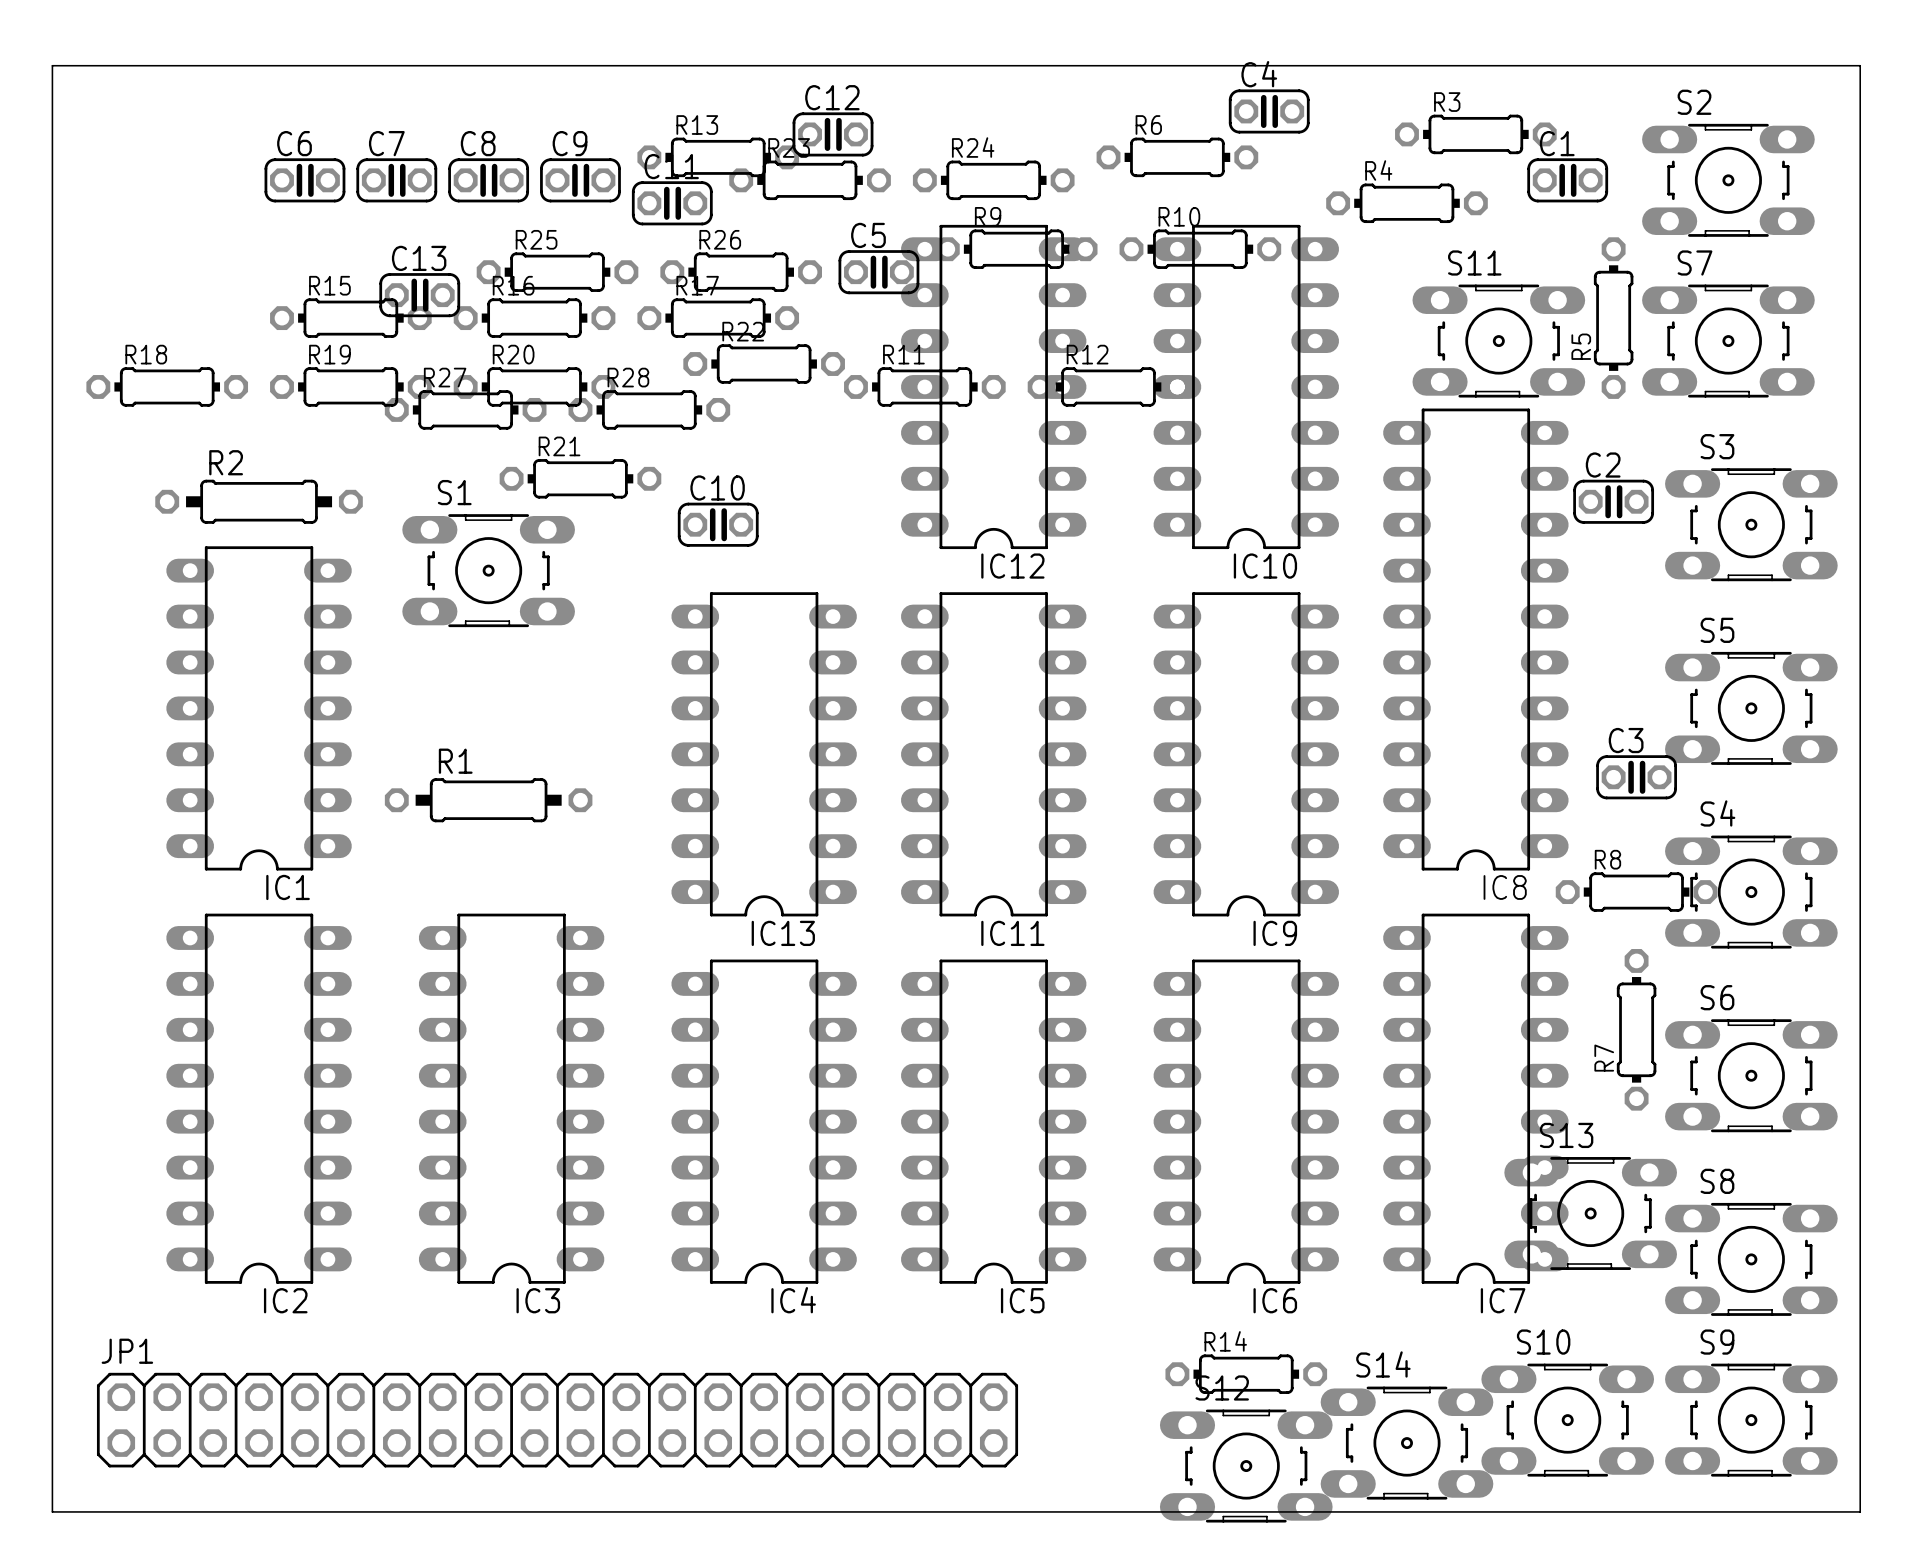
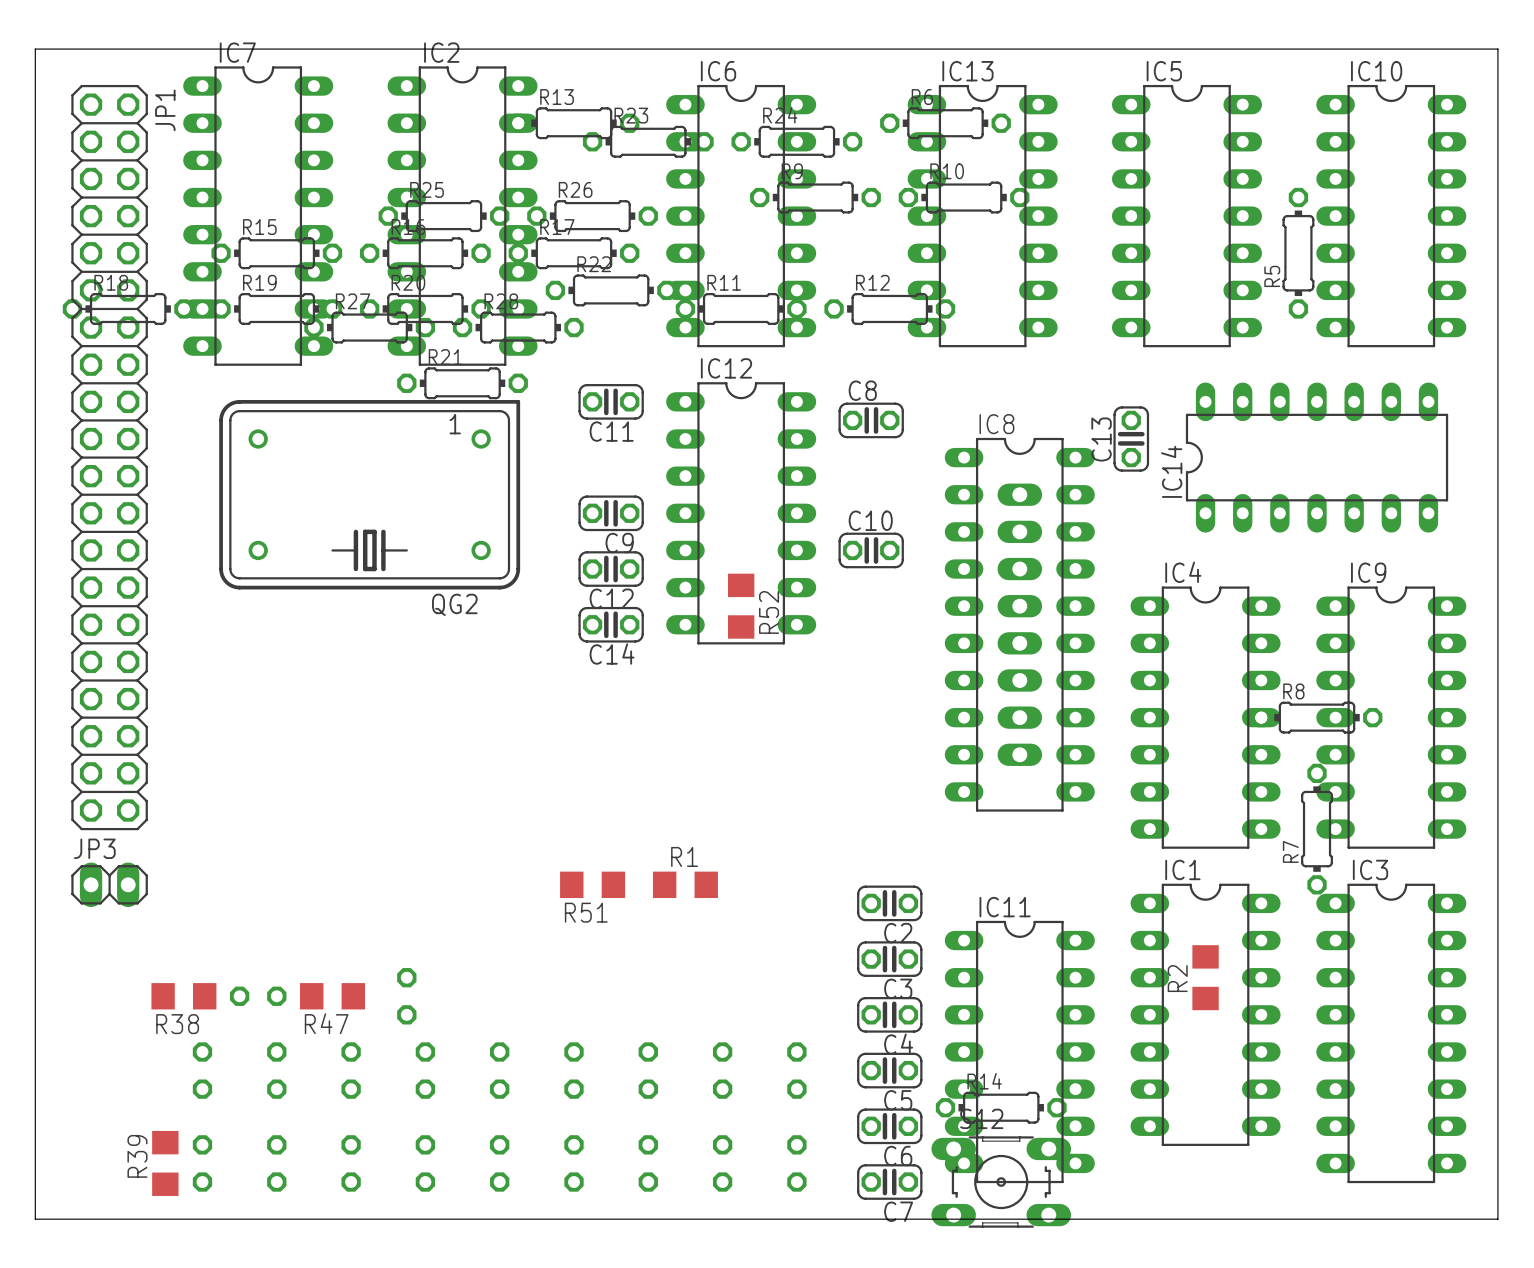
C4 rotation: 0° (1269, 111) -> 180° (889, 1014)
C4 position: (1269, 111) -> (889, 1014)
C12 rotation: 0° (833, 134) -> 180° (611, 569)
C12 position: (833, 134) -> (611, 569)
R3: (1475, 134) -> none
C6 rotation: 0° (304, 180) -> 180° (889, 1126)
C6 position: (304, 180) -> (889, 1126)
C7 rotation: 0° (396, 180) -> 180° (889, 1182)
C7 position: (396, 180) -> (889, 1182)
C8 position: (488, 180) -> (871, 420)
C9 rotation: 0° (580, 180) -> 180° (611, 513)
C9 position: (580, 180) -> (611, 513)
C1: (1567, 180) -> none
S2: (1728, 180) -> none
C11 rotation: 0° (672, 203) -> 180° (611, 401)
C11 position: (672, 203) -> (611, 401)
R4: (1406, 203) -> none
C5 rotation: 0° (878, 272) -> 180° (889, 1070)
C5 position: (878, 272) -> (889, 1070)
C13 rotation: 0° (419, 295) -> 90° counterclockwise (1131, 439)
C13 position: (419, 295) -> (1131, 439)
S11: (1498, 341) -> none
S7: (1728, 341) -> none
IC12 rotation: 0° (993, 386) -> 180° (741, 513)
IC12 position: (993, 386) -> (741, 513)
IC10 rotation: 0° (1246, 386) -> 180° (1391, 216)
IC10 position: (1246, 386) -> (1391, 216)
R2 footprint: [155, 479, 363, 524] -> [1192, 945, 1219, 1011]
C2 rotation: 0° (1613, 501) -> 180° (889, 903)
C2 position: (1613, 501) -> (889, 903)
C10 position: (718, 524) -> (871, 550)
S3: (1751, 524) -> none
S1: (488, 570) -> none
IC14: none -> (1317, 457)
QG2: none -> (369, 494)
IC8 rotation: 0° (1475, 639) -> 180° (1019, 624)
IC1 rotation: 0° (259, 708) -> 180° (1205, 1014)
IC1 position: (259, 708) -> (1205, 1014)
S5: (1751, 708) -> none
IC13 rotation: 0° (764, 754) -> 180° (982, 216)
IC13 position: (764, 754) -> (982, 216)
R52: none -> (741, 606)
IC11 rotation: 0° (993, 754) -> 180° (1019, 1051)
IC11 position: (993, 754) -> (1019, 1051)
IC9 rotation: 0° (1246, 754) -> 180° (1391, 717)
IC9 position: (1246, 754) -> (1391, 717)
C14: none -> (611, 624)
part: none -> (1019, 624)
C3 rotation: 0° (1636, 777) -> 180° (889, 959)
C3 position: (1636, 777) -> (889, 959)
R1 footprint: [384, 778, 593, 823] -> [652, 871, 718, 899]
S4: (1751, 892) -> none
S6: (1751, 1075) -> none
JP3: none -> (109, 884)
IC2 rotation: 0° (259, 1098) -> 180° (462, 216)
IC2 position: (259, 1098) -> (462, 216)
IC3 rotation: 0° (511, 1098) -> 180° (1391, 1033)
IC3 position: (511, 1098) -> (1391, 1033)
R51: none -> (592, 884)
IC7 rotation: 0° (1475, 1098) -> 180° (258, 216)
IC7 position: (1475, 1098) -> (258, 216)
IC4 rotation: 0° (764, 1121) -> 180° (1205, 717)
IC4 position: (764, 1121) -> (1205, 717)
IC5 rotation: 0° (993, 1121) -> 180° (1186, 216)
IC5 position: (993, 1121) -> (1186, 216)
IC6 rotation: 0° (1246, 1121) -> 180° (741, 216)
IC6 position: (1246, 1121) -> (741, 216)
S13: (1590, 1213) -> none
R38: none -> (183, 996)
part: none -> (258, 996)
R47: none -> (332, 996)
part: none -> (406, 996)
S8: (1751, 1259) -> none
part: none -> (202, 1070)
part: none -> (276, 1070)
part: none -> (351, 1070)
part: none -> (425, 1070)
part: none -> (499, 1070)
part: none -> (573, 1070)
part: none -> (648, 1070)
part: none -> (722, 1070)
part: none -> (796, 1070)
JP1 rotation: 0° (557, 1420) -> 90° clockwise (109, 457)
JP1 position: (557, 1420) -> (109, 457)
S10: (1567, 1420) -> none
S9: (1751, 1420) -> none
R39: none -> (165, 1163)
part: none -> (202, 1163)
part: none -> (276, 1163)
part: none -> (351, 1163)
part: none -> (425, 1163)
part: none -> (499, 1163)
part: none -> (573, 1163)
part: none -> (648, 1163)
part: none -> (722, 1163)
part: none -> (796, 1163)
S14: (1406, 1443) -> none

